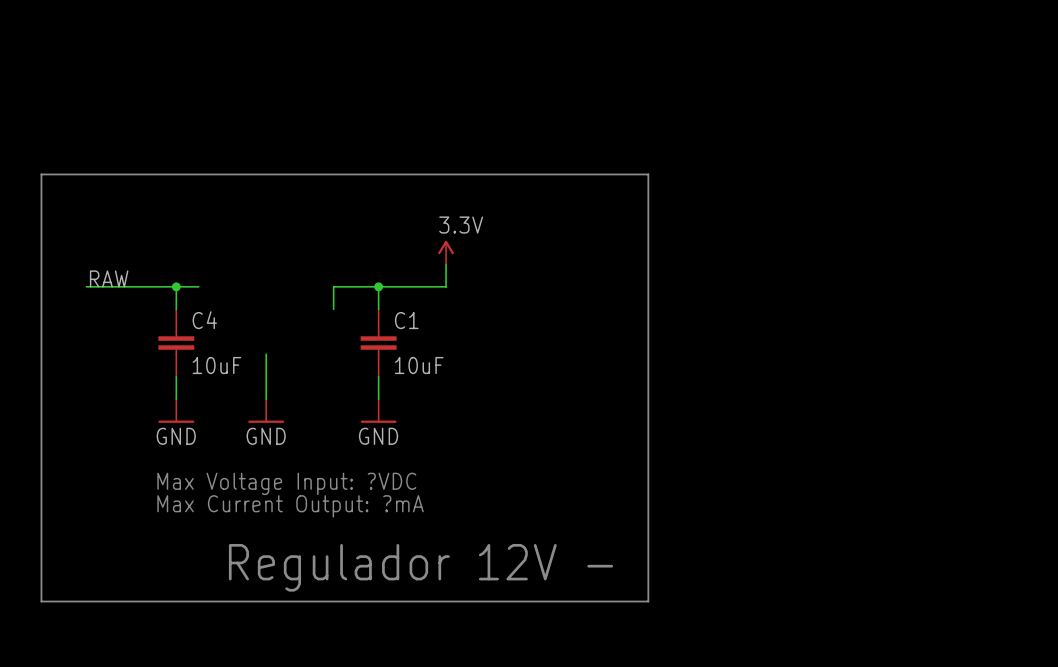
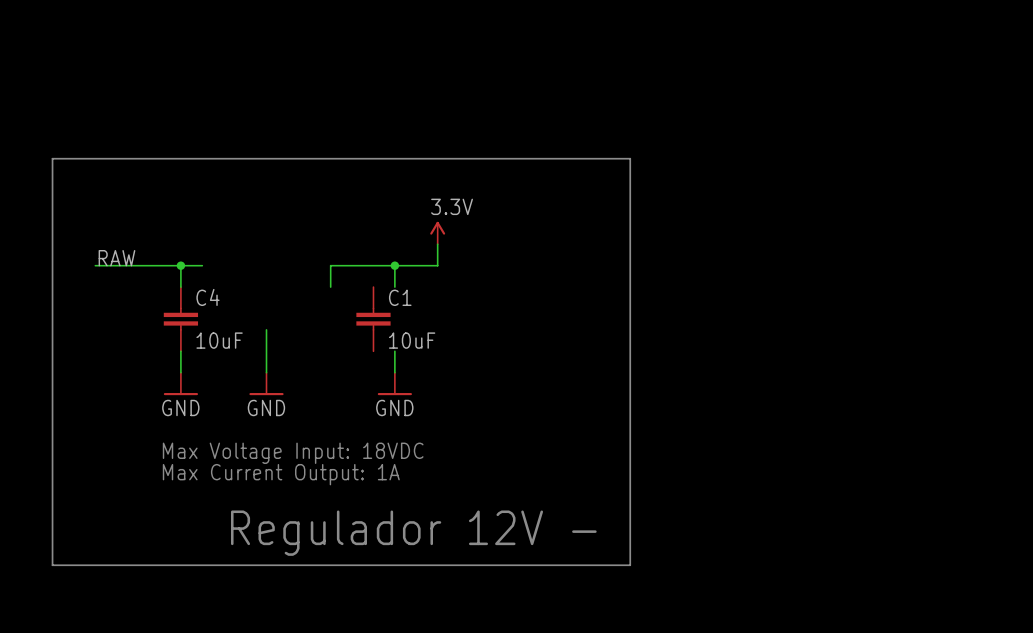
wire: (378, 286) (378, 309) -> (394, 265) (394, 287)
junction position: (378, 286) -> (394, 265)
wire: (378, 376) (378, 399) -> (394, 351) (394, 372)
power symbol position: GND (378, 411) -> GND (394, 383)
text: Max Voltage Input: ?VDC (286, 483) -> Max Voltage Input: 18VDC (293, 453)
text: Max Current Output: ?mA (290, 506) -> Max Current Output: 1A (281, 474)

